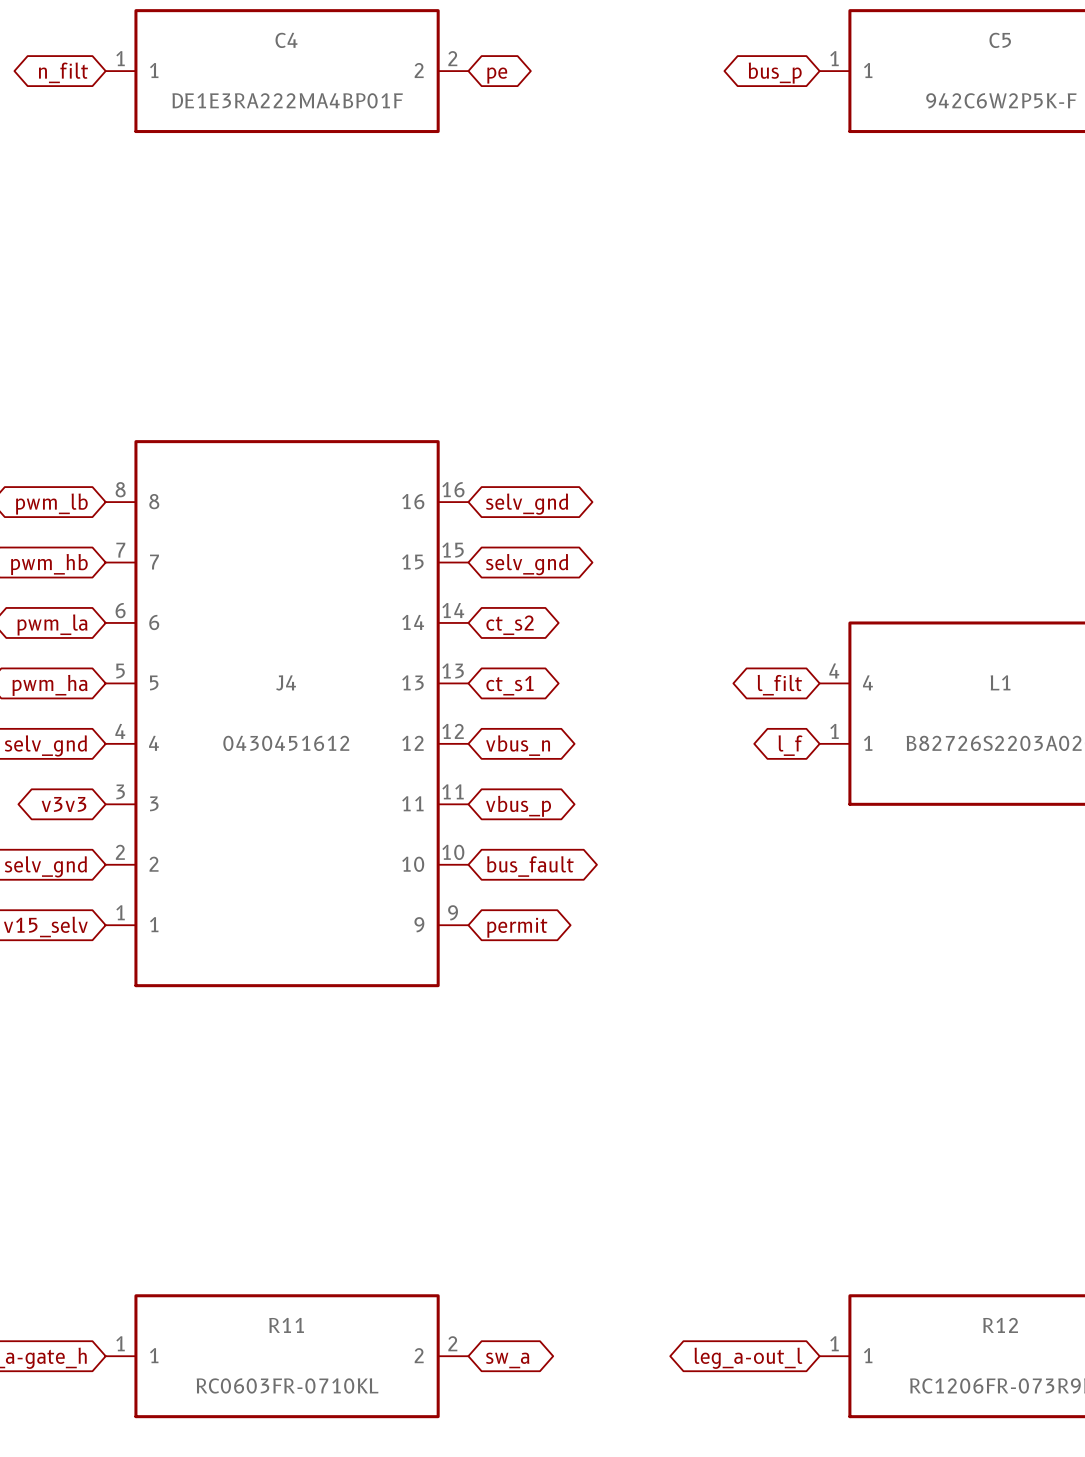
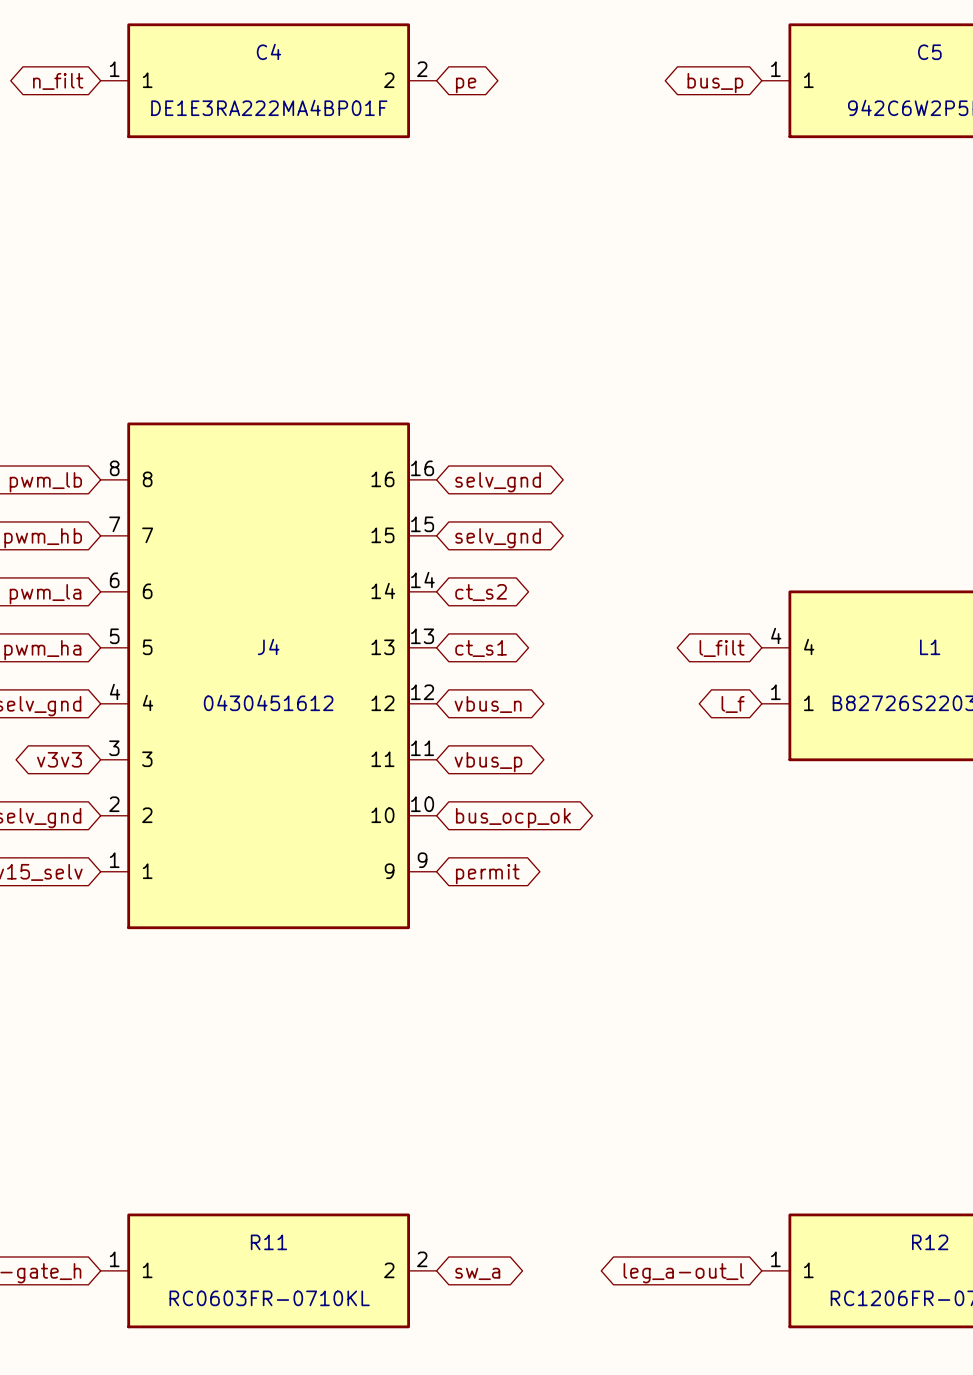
global label: bus_fault (530, 866) -> bus_ocp_ok (513, 818)

